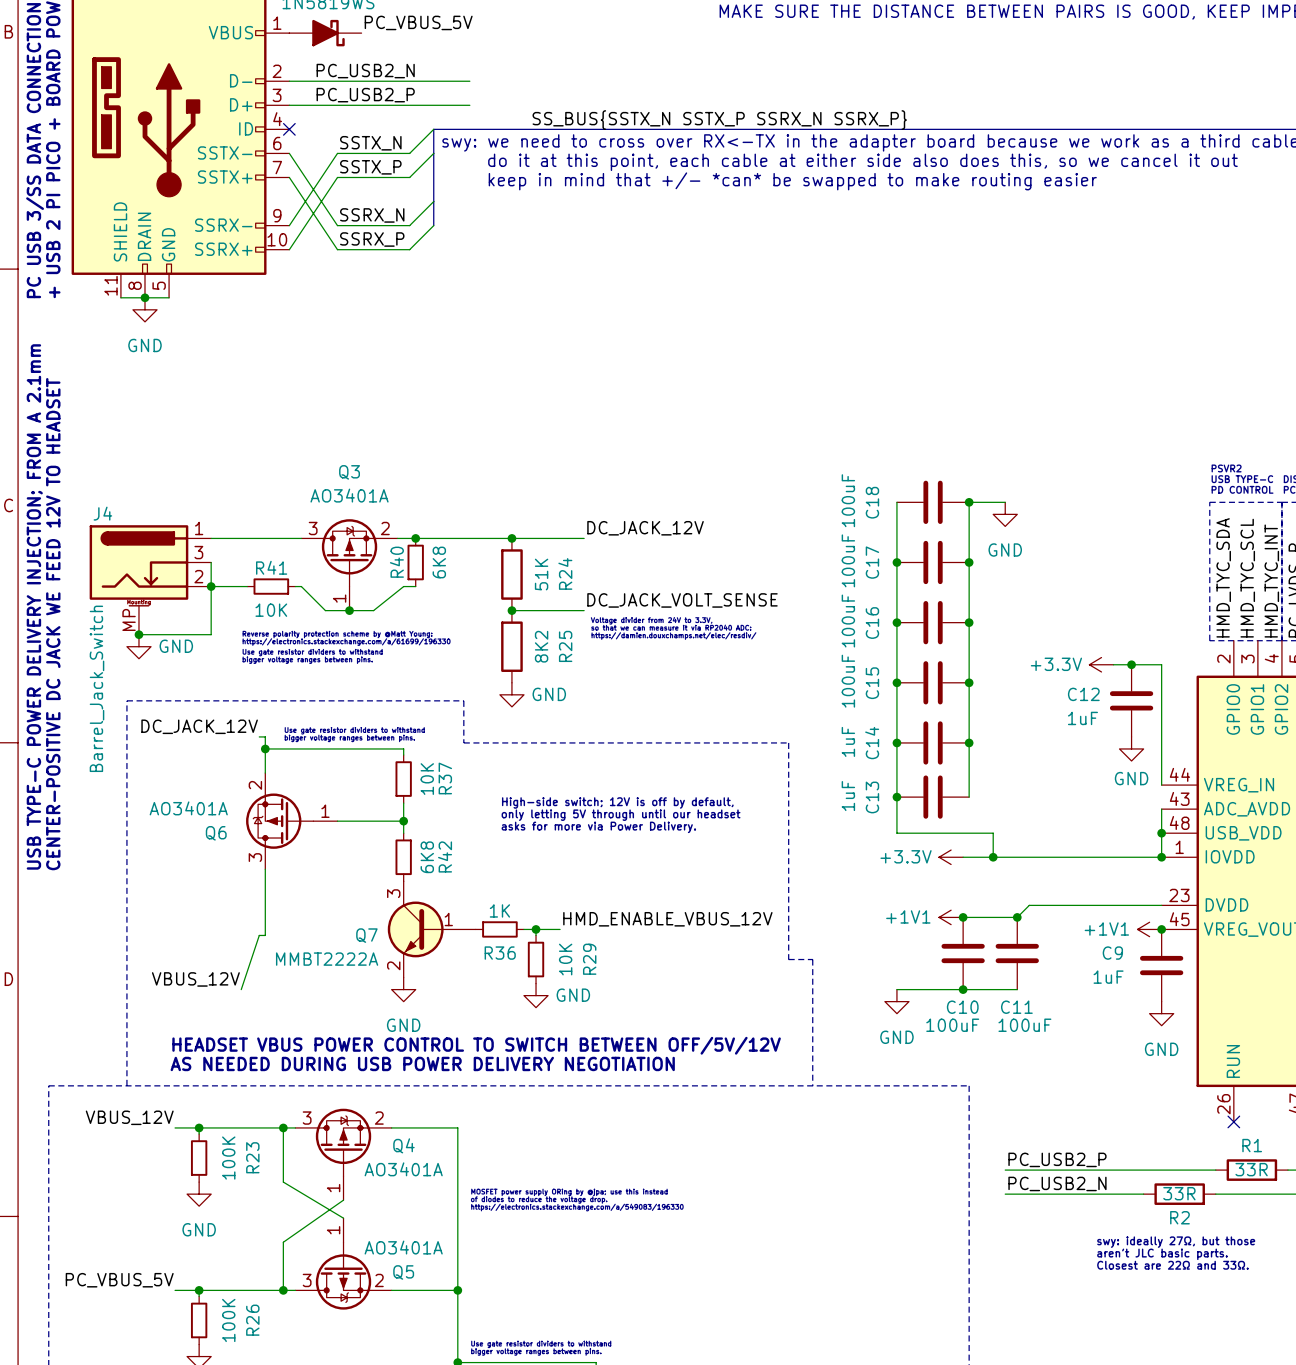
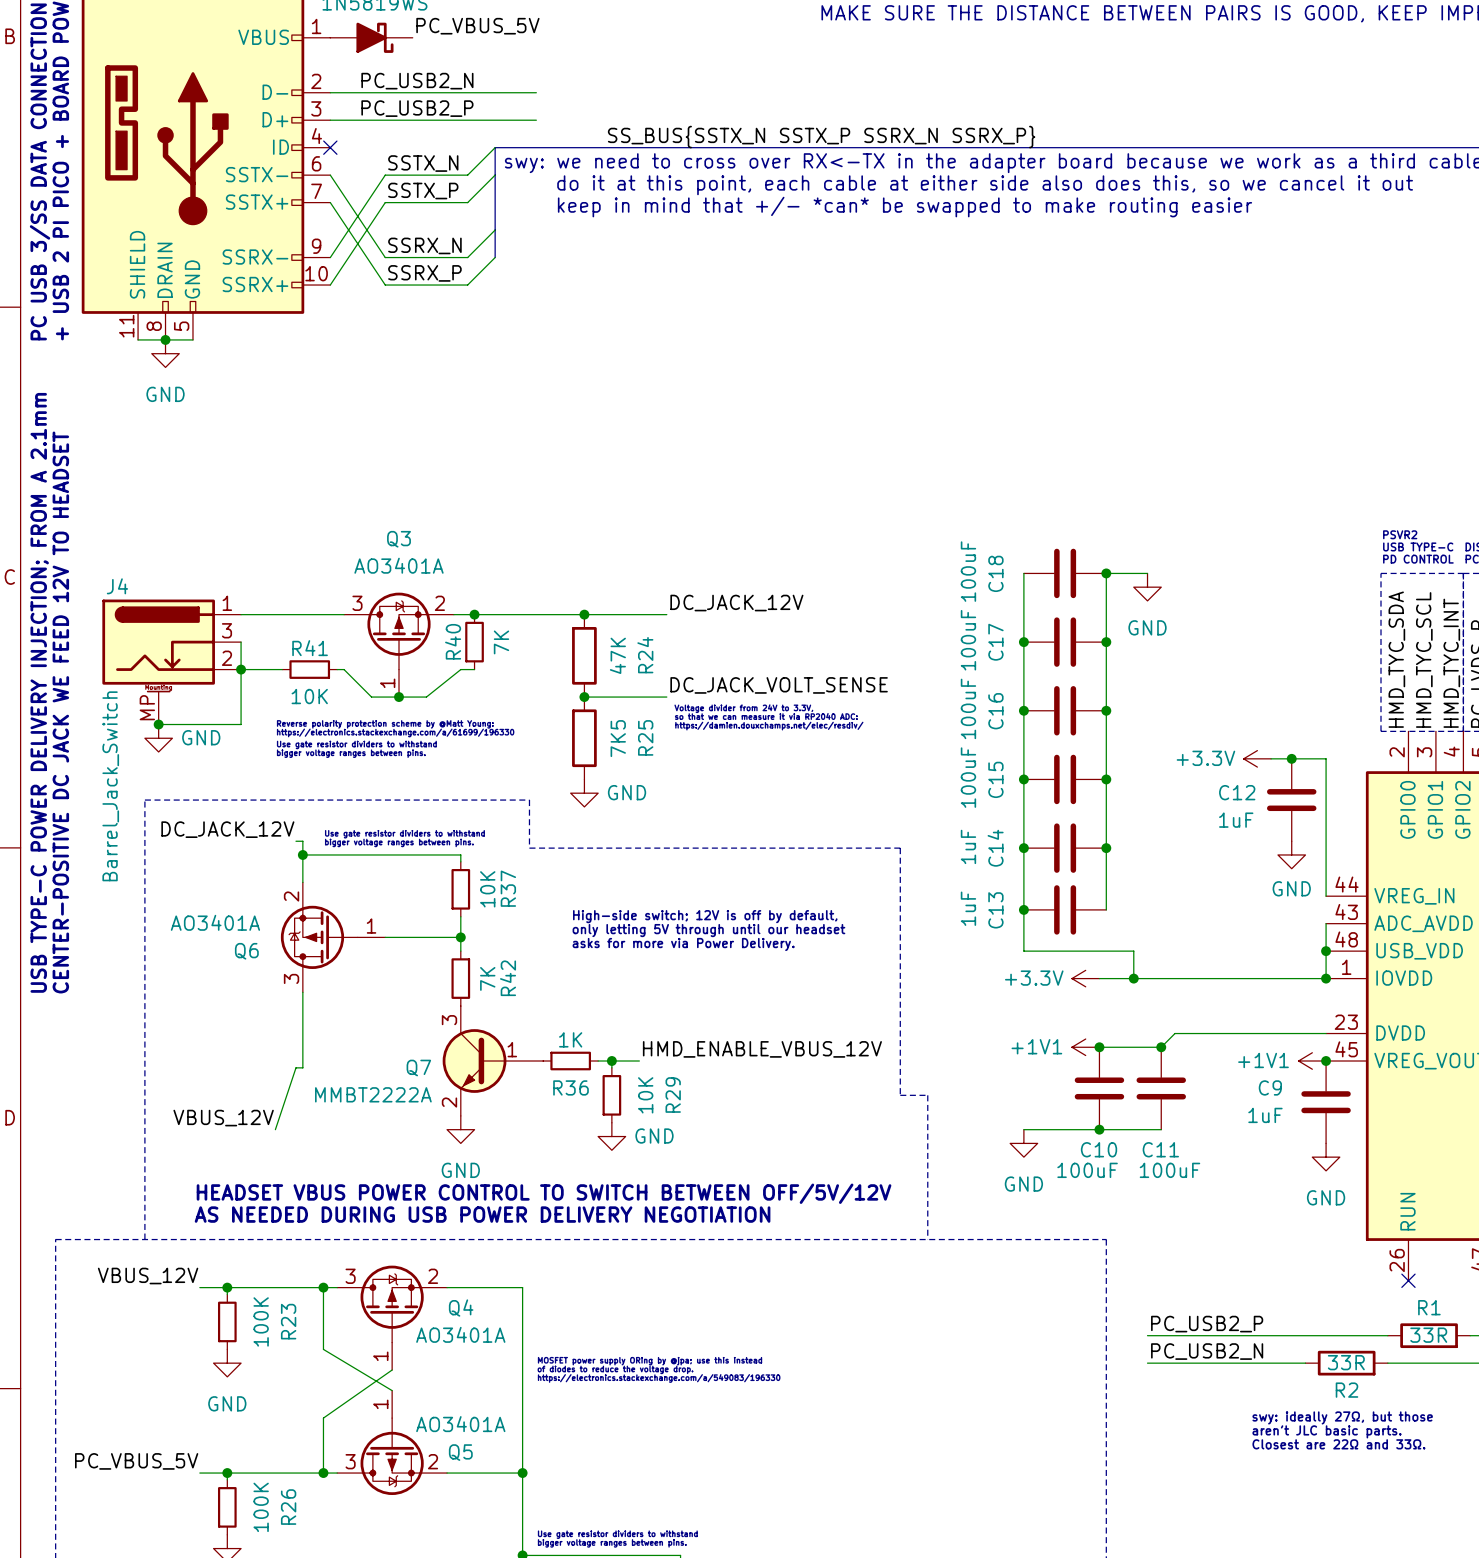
R40 value: 6K8 (439, 562) -> 7K (501, 642)
R24 value: 51K (541, 574) -> 47K (617, 655)
R25 value: 8K2 (541, 646) -> 7K5 (618, 738)
R42 value: 6K8 (427, 857) -> 7K (487, 978)

